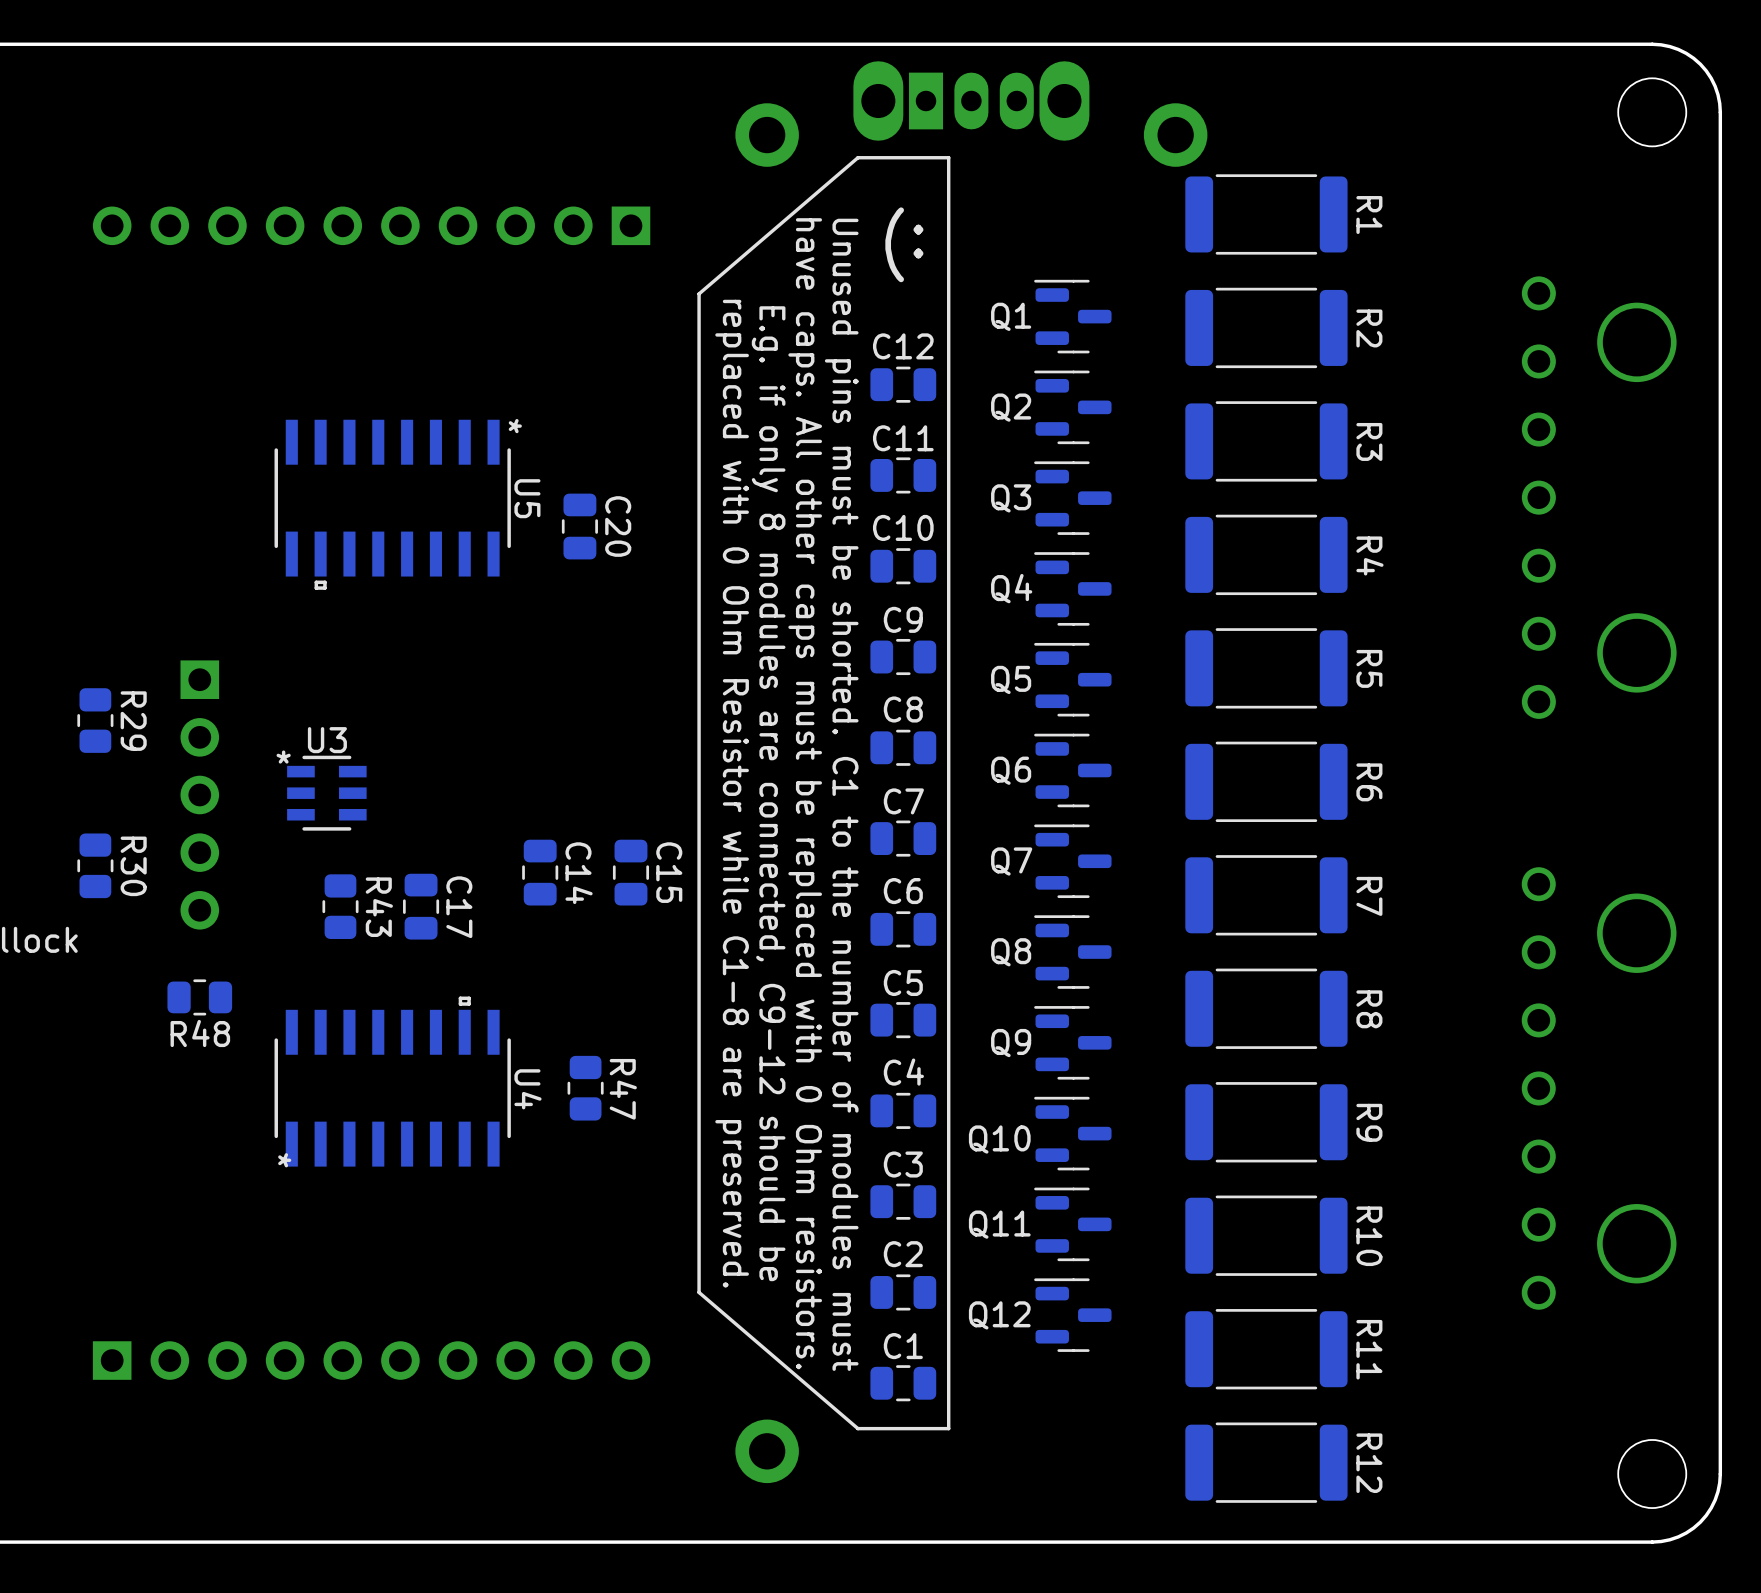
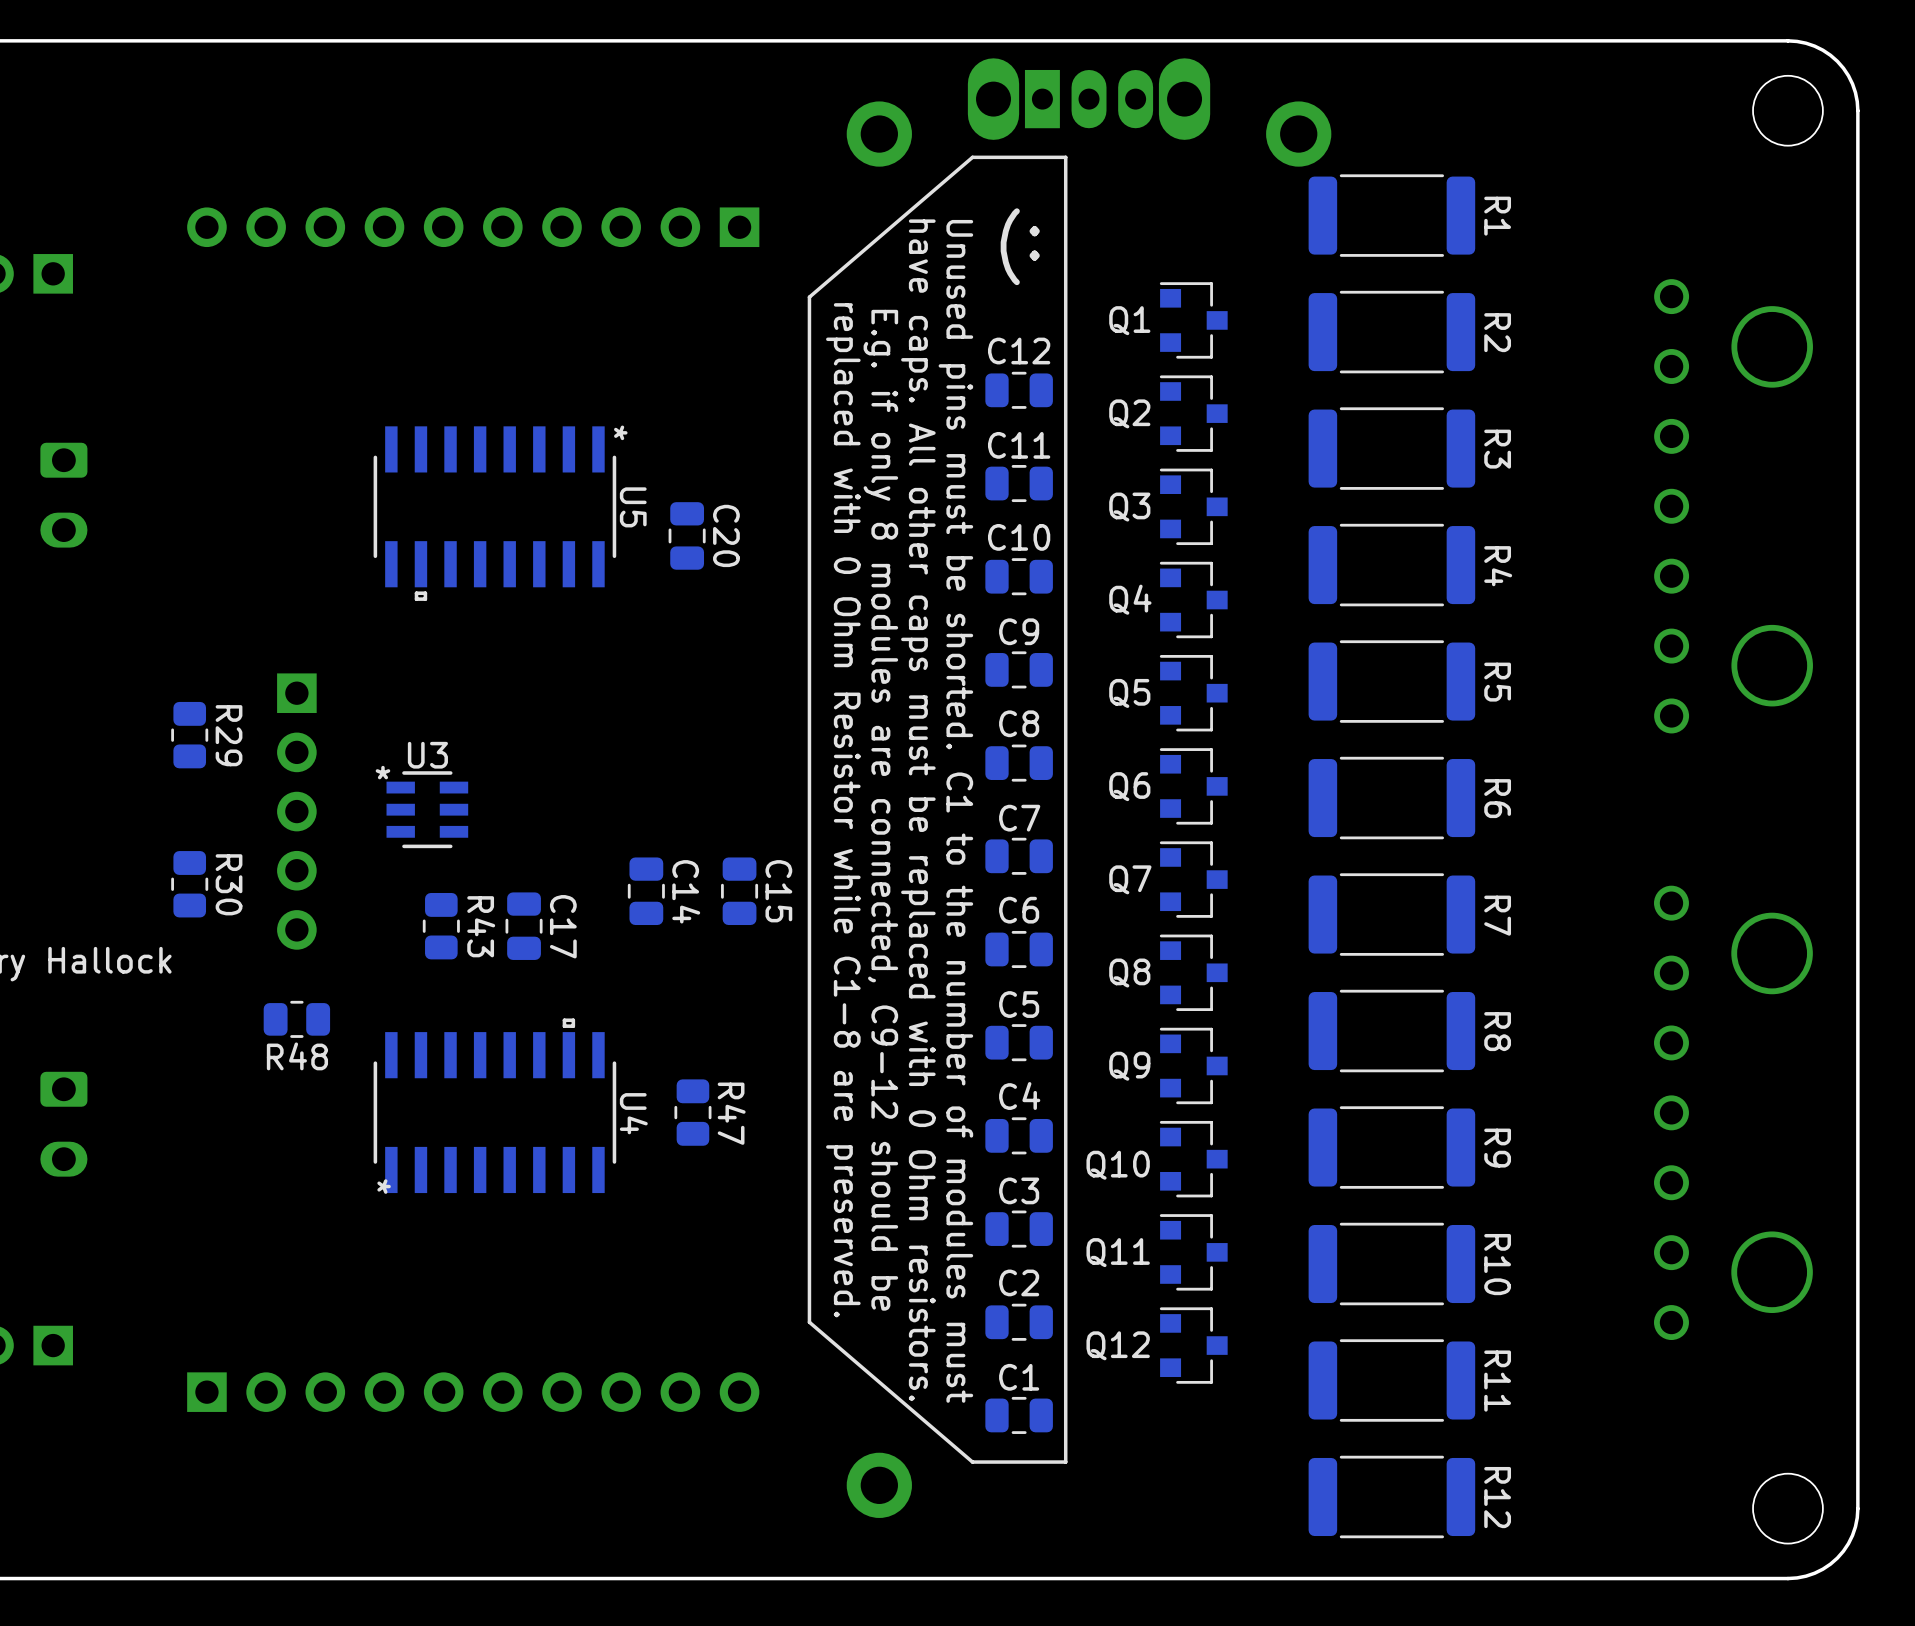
Q1 footprint: [1034, 279, 1112, 354] -> [1159, 282, 1228, 359]
Q2 footprint: [1034, 370, 1112, 445] -> [1159, 375, 1228, 452]
Q3 footprint: [1034, 461, 1112, 535] -> [1159, 468, 1228, 546]
Q4 footprint: [1034, 552, 1112, 626] -> [1159, 561, 1228, 639]
Q5 footprint: [1034, 642, 1112, 717] -> [1159, 654, 1228, 732]
Q6 footprint: [1034, 733, 1112, 808] -> [1159, 748, 1228, 825]
Q7 footprint: [1034, 824, 1112, 899] -> [1159, 841, 1228, 918]
Q8 footprint: [1034, 915, 1112, 989] -> [1159, 934, 1228, 1011]
Q9 footprint: [1034, 1006, 1112, 1080] -> [1159, 1027, 1228, 1105]
Q10 footprint: [1034, 1096, 1112, 1171] -> [1159, 1120, 1228, 1198]
Q11 footprint: [1034, 1187, 1112, 1262] -> [1159, 1214, 1228, 1291]
Q12 footprint: [1034, 1278, 1112, 1352] -> [1159, 1307, 1228, 1384]

